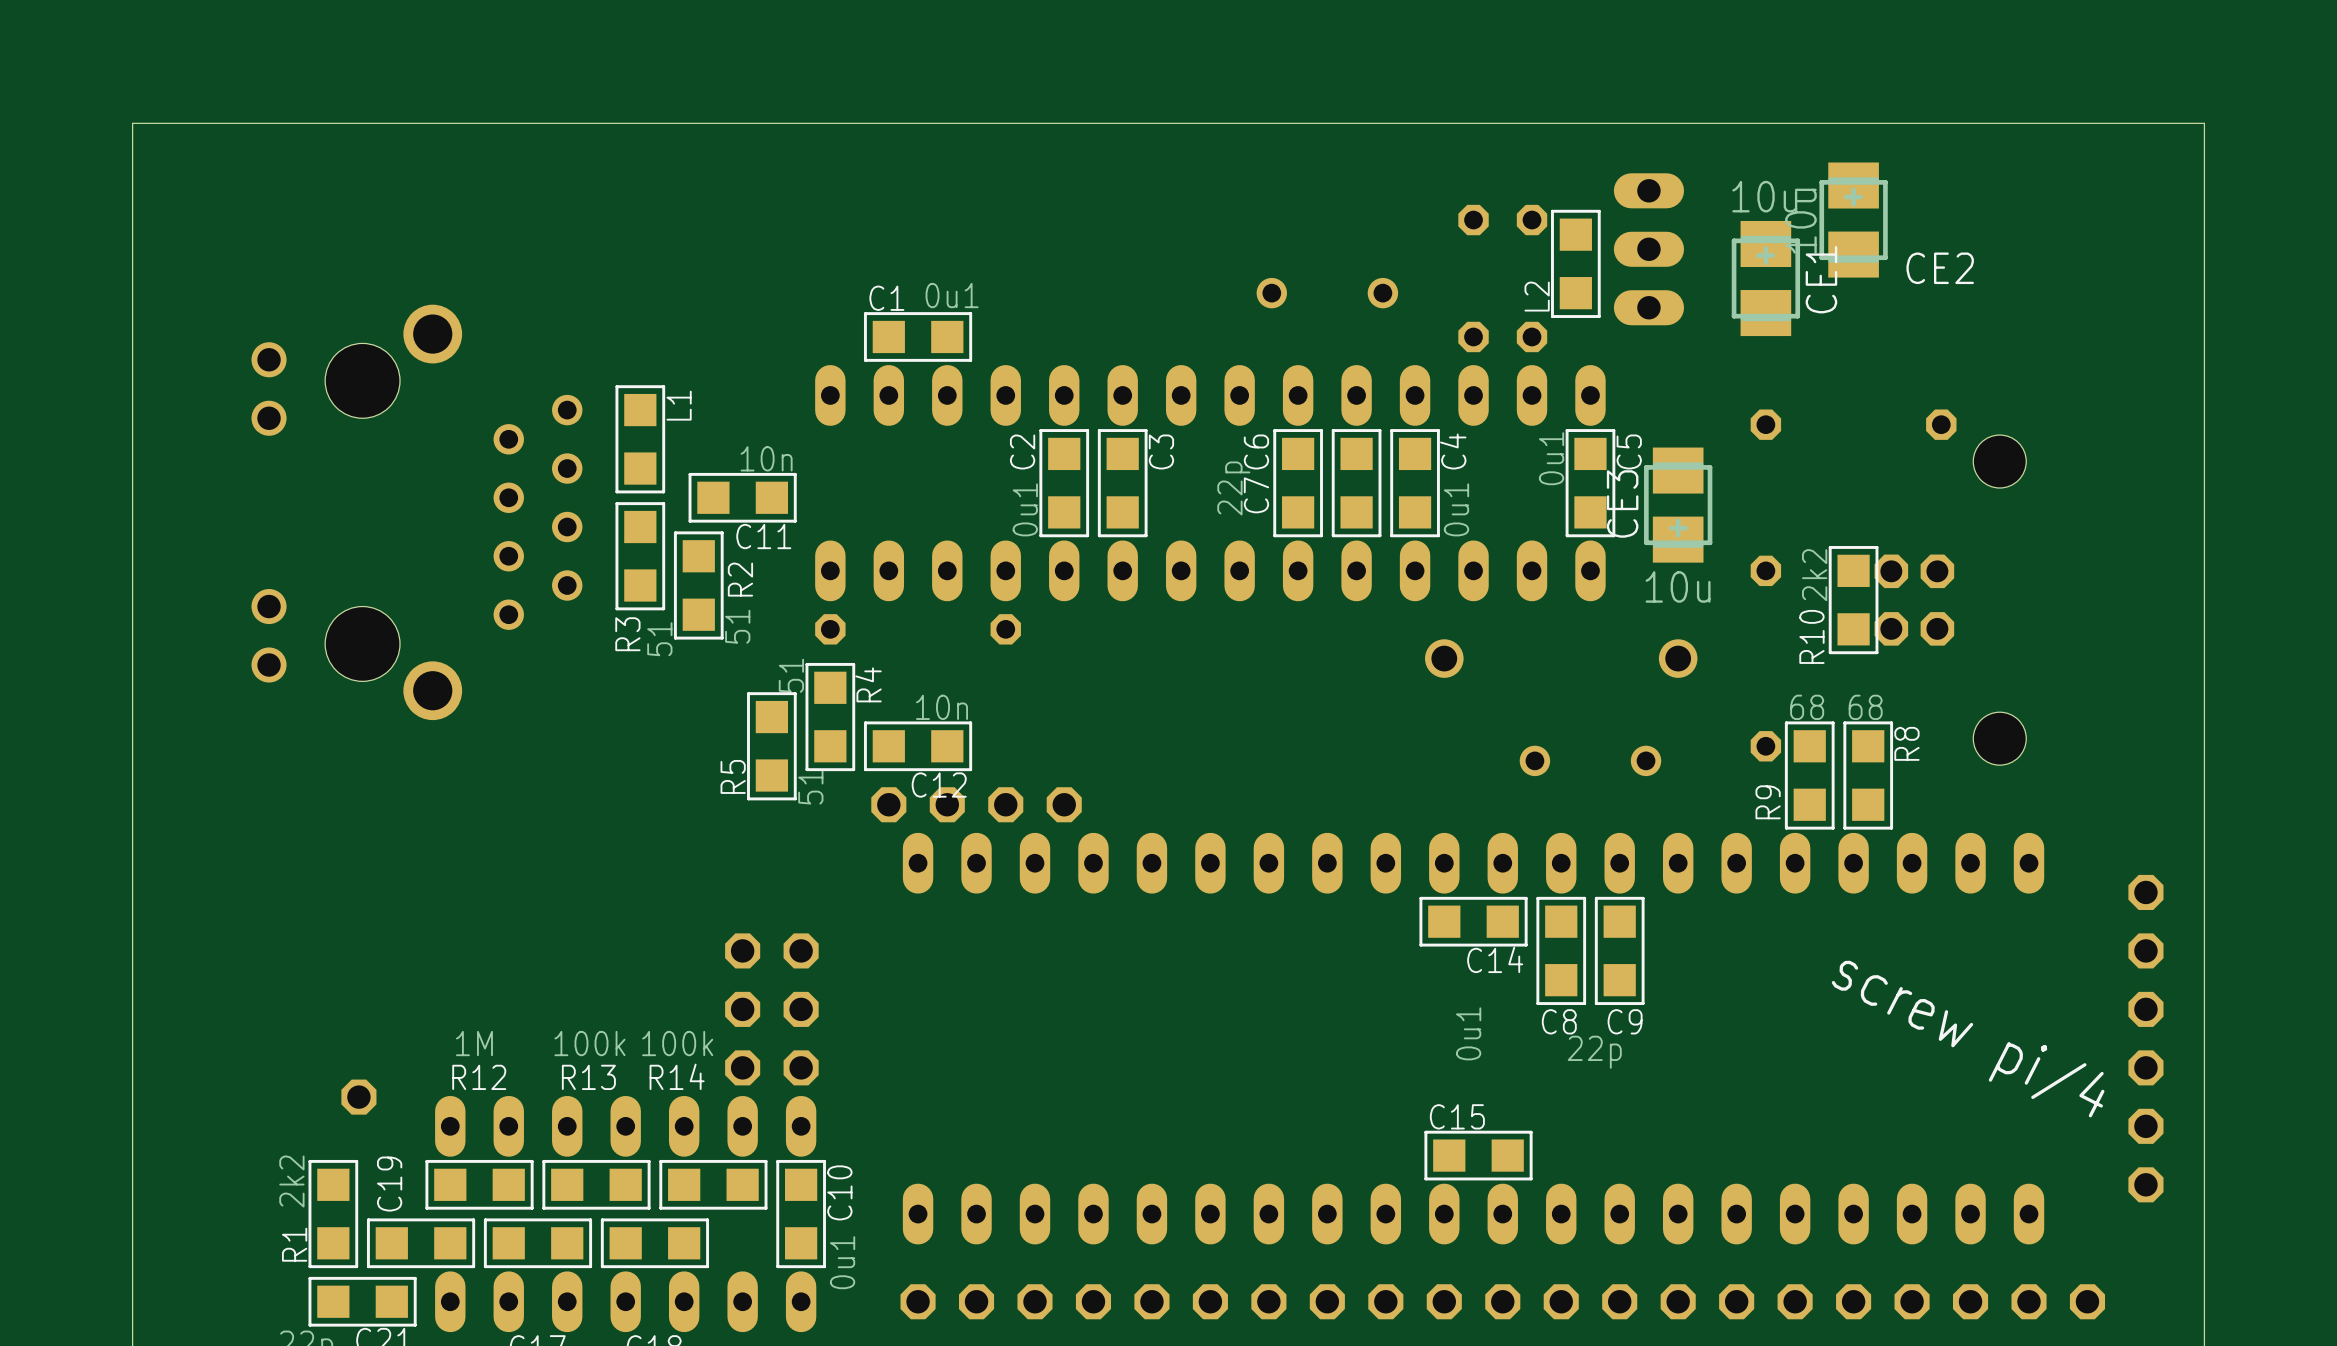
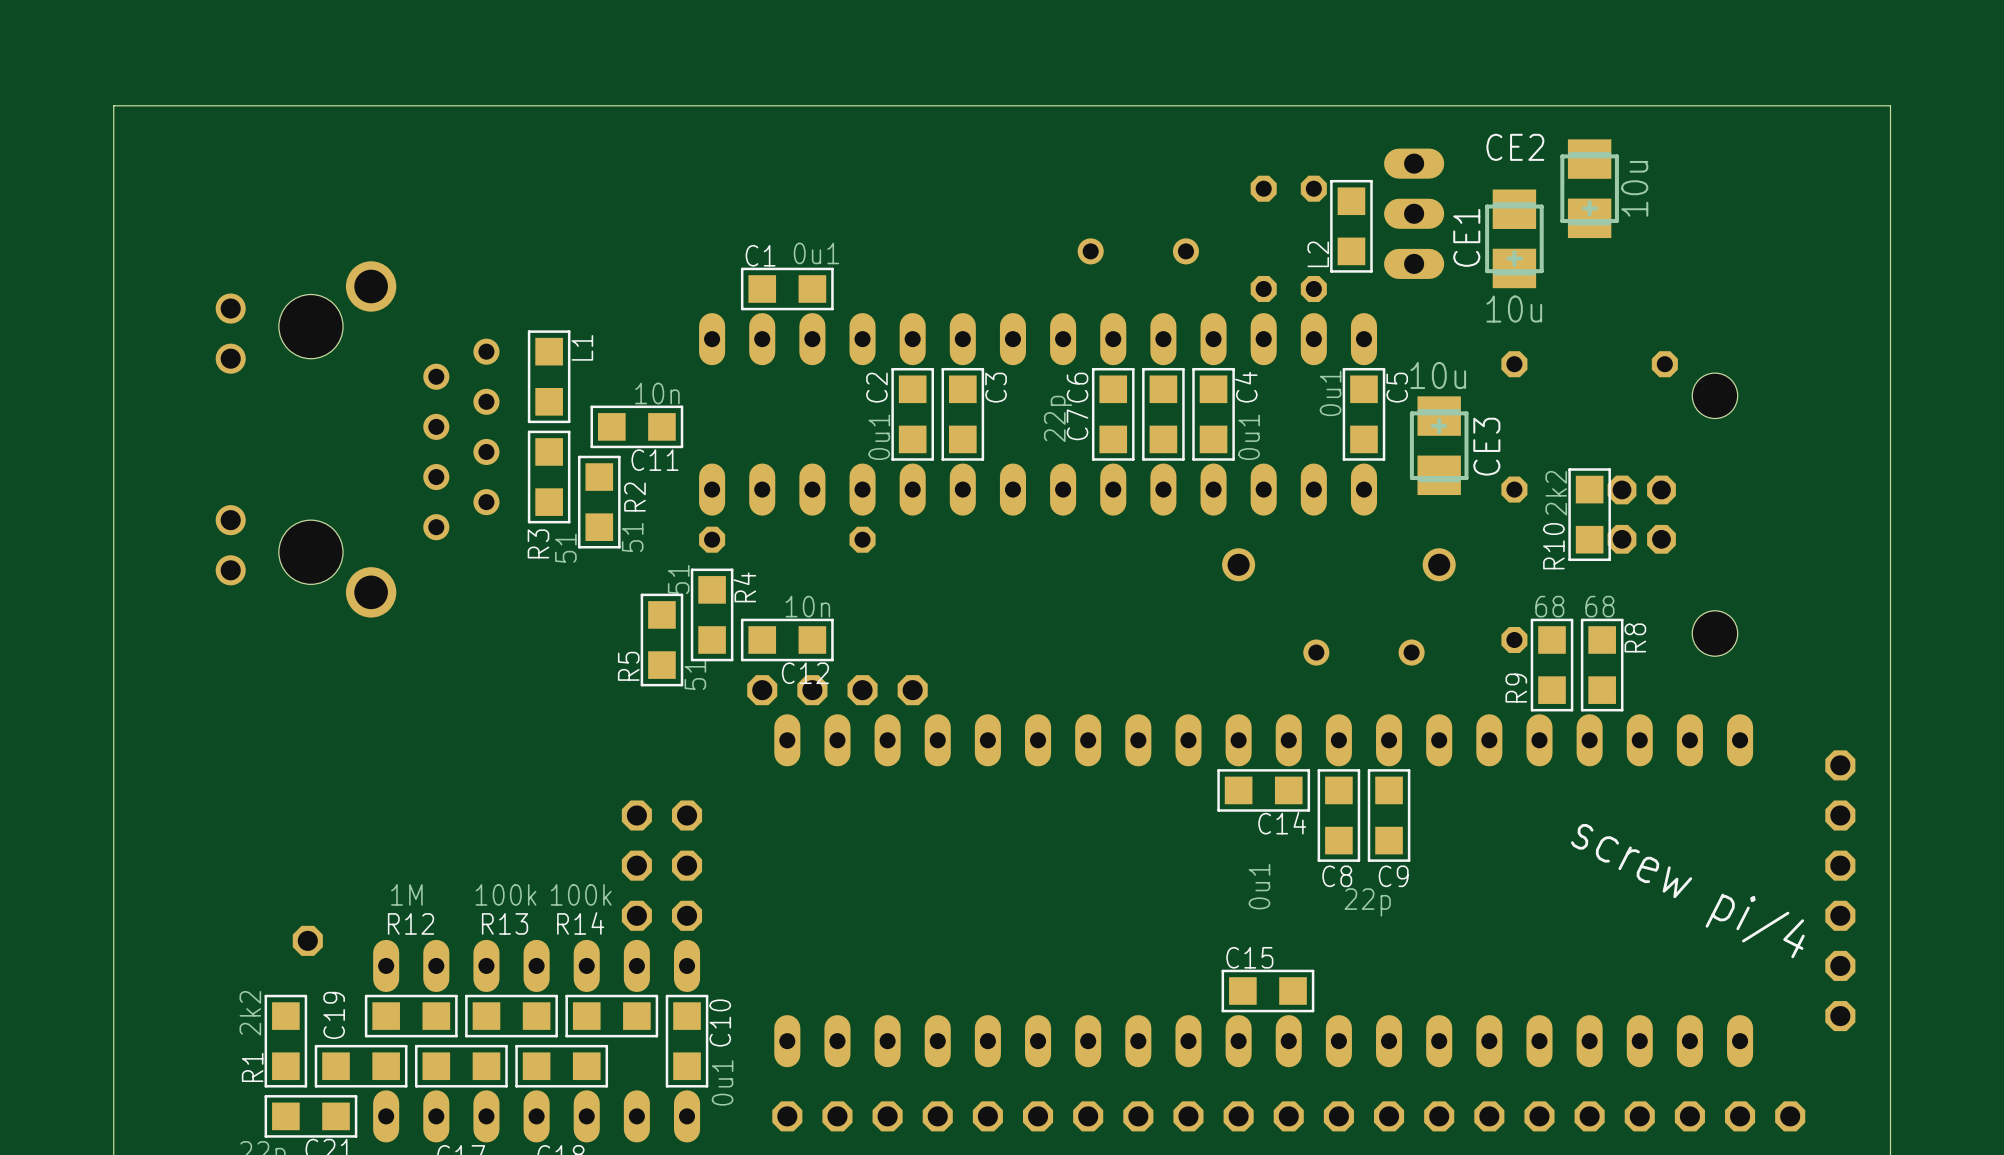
CE2 rotation: 0° (1853, 220) -> 180° (1589, 188)
CE1 rotation: 0° (1765, 278) -> 180° (1514, 238)
CE3 rotation: 0° (1678, 505) -> 180° (1439, 445)

